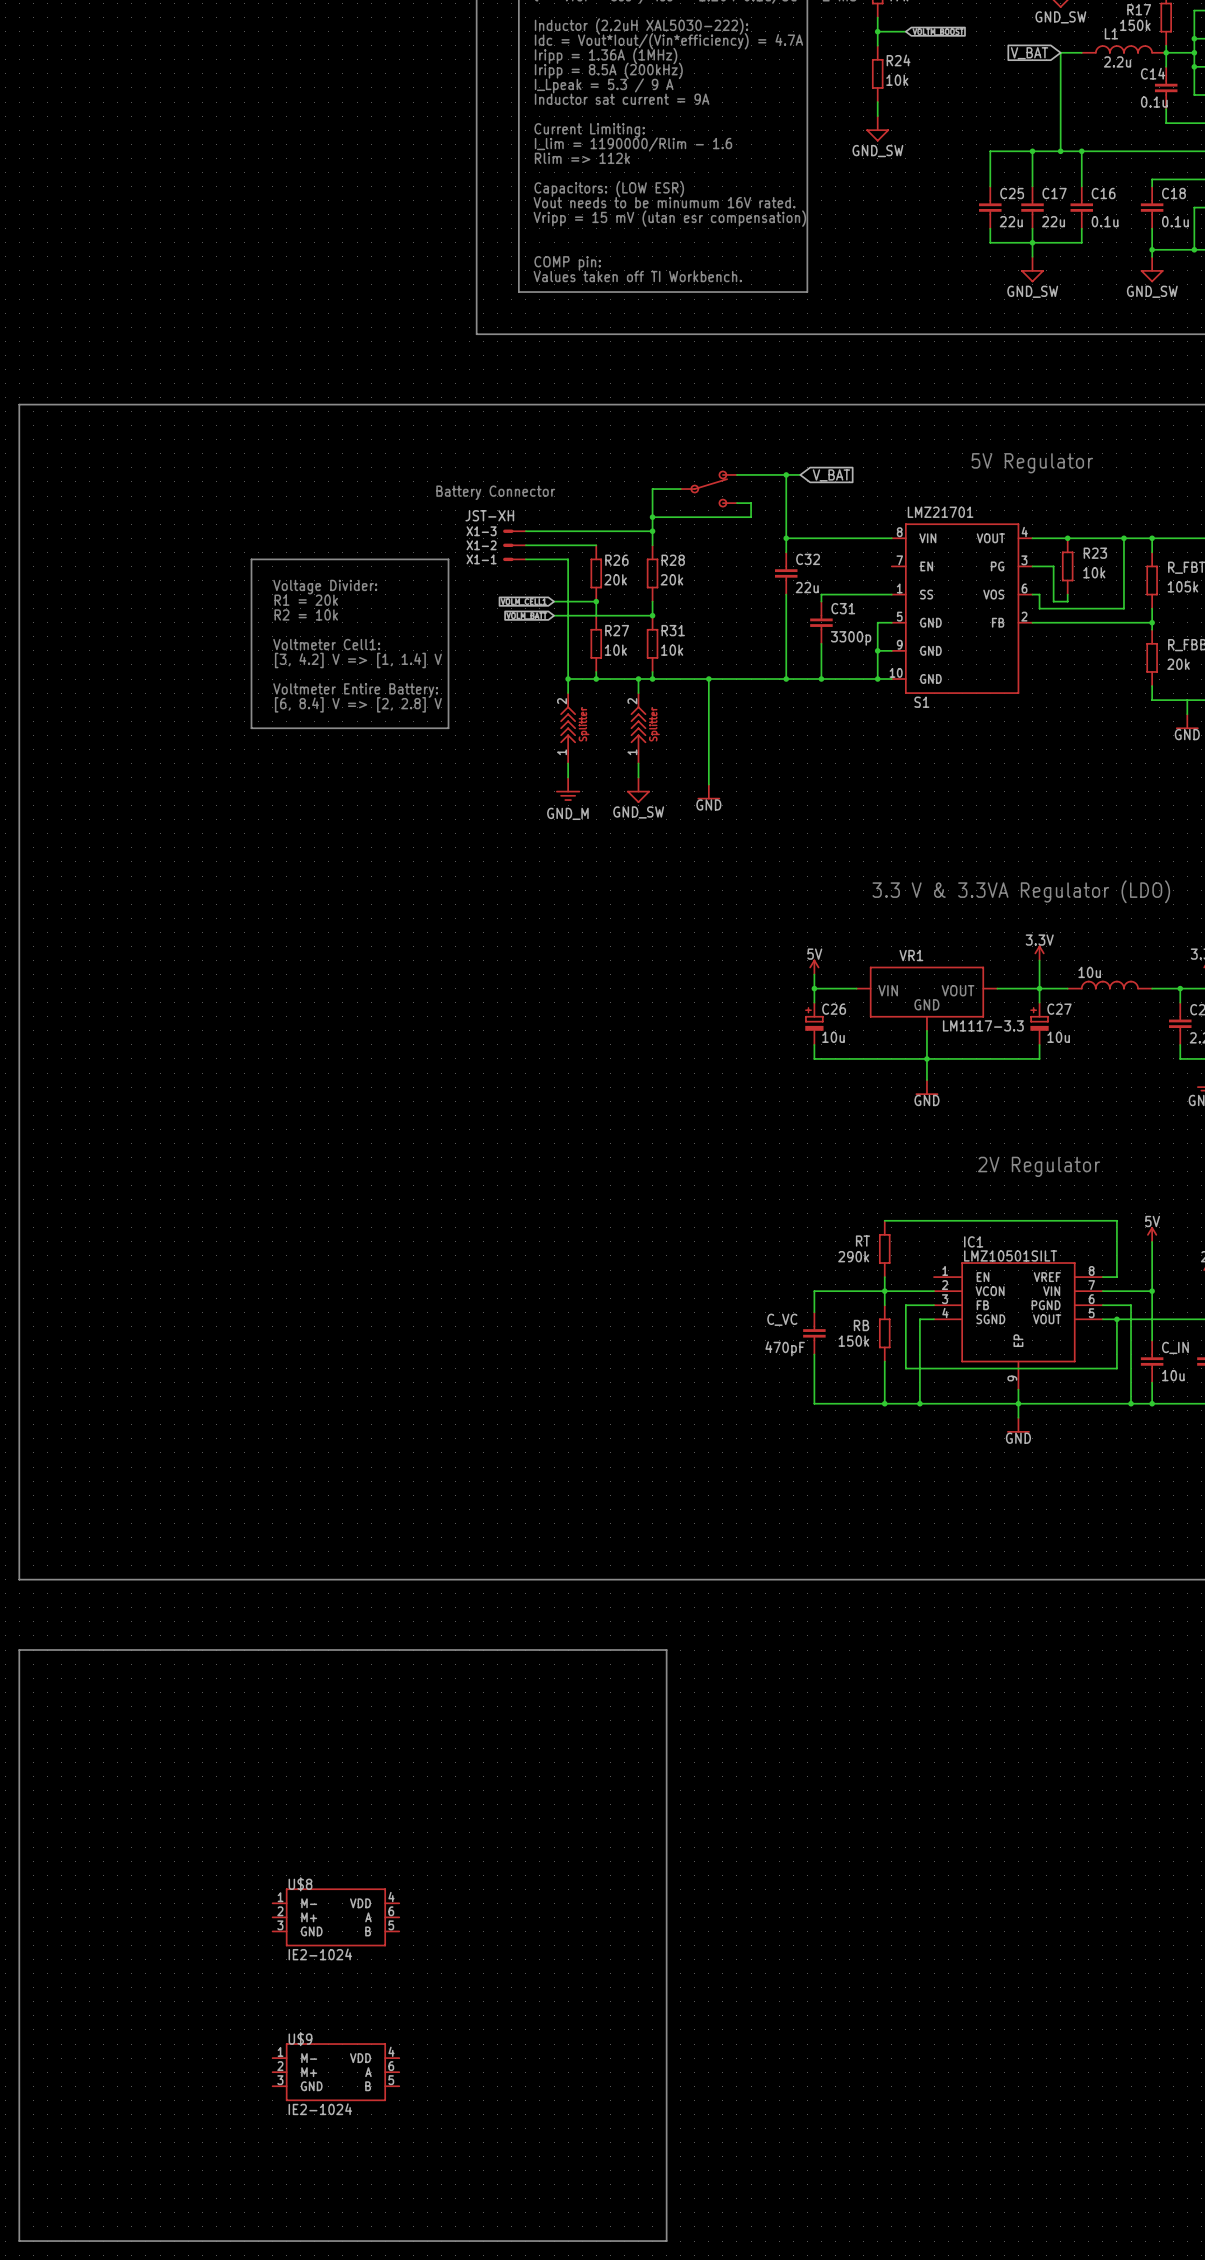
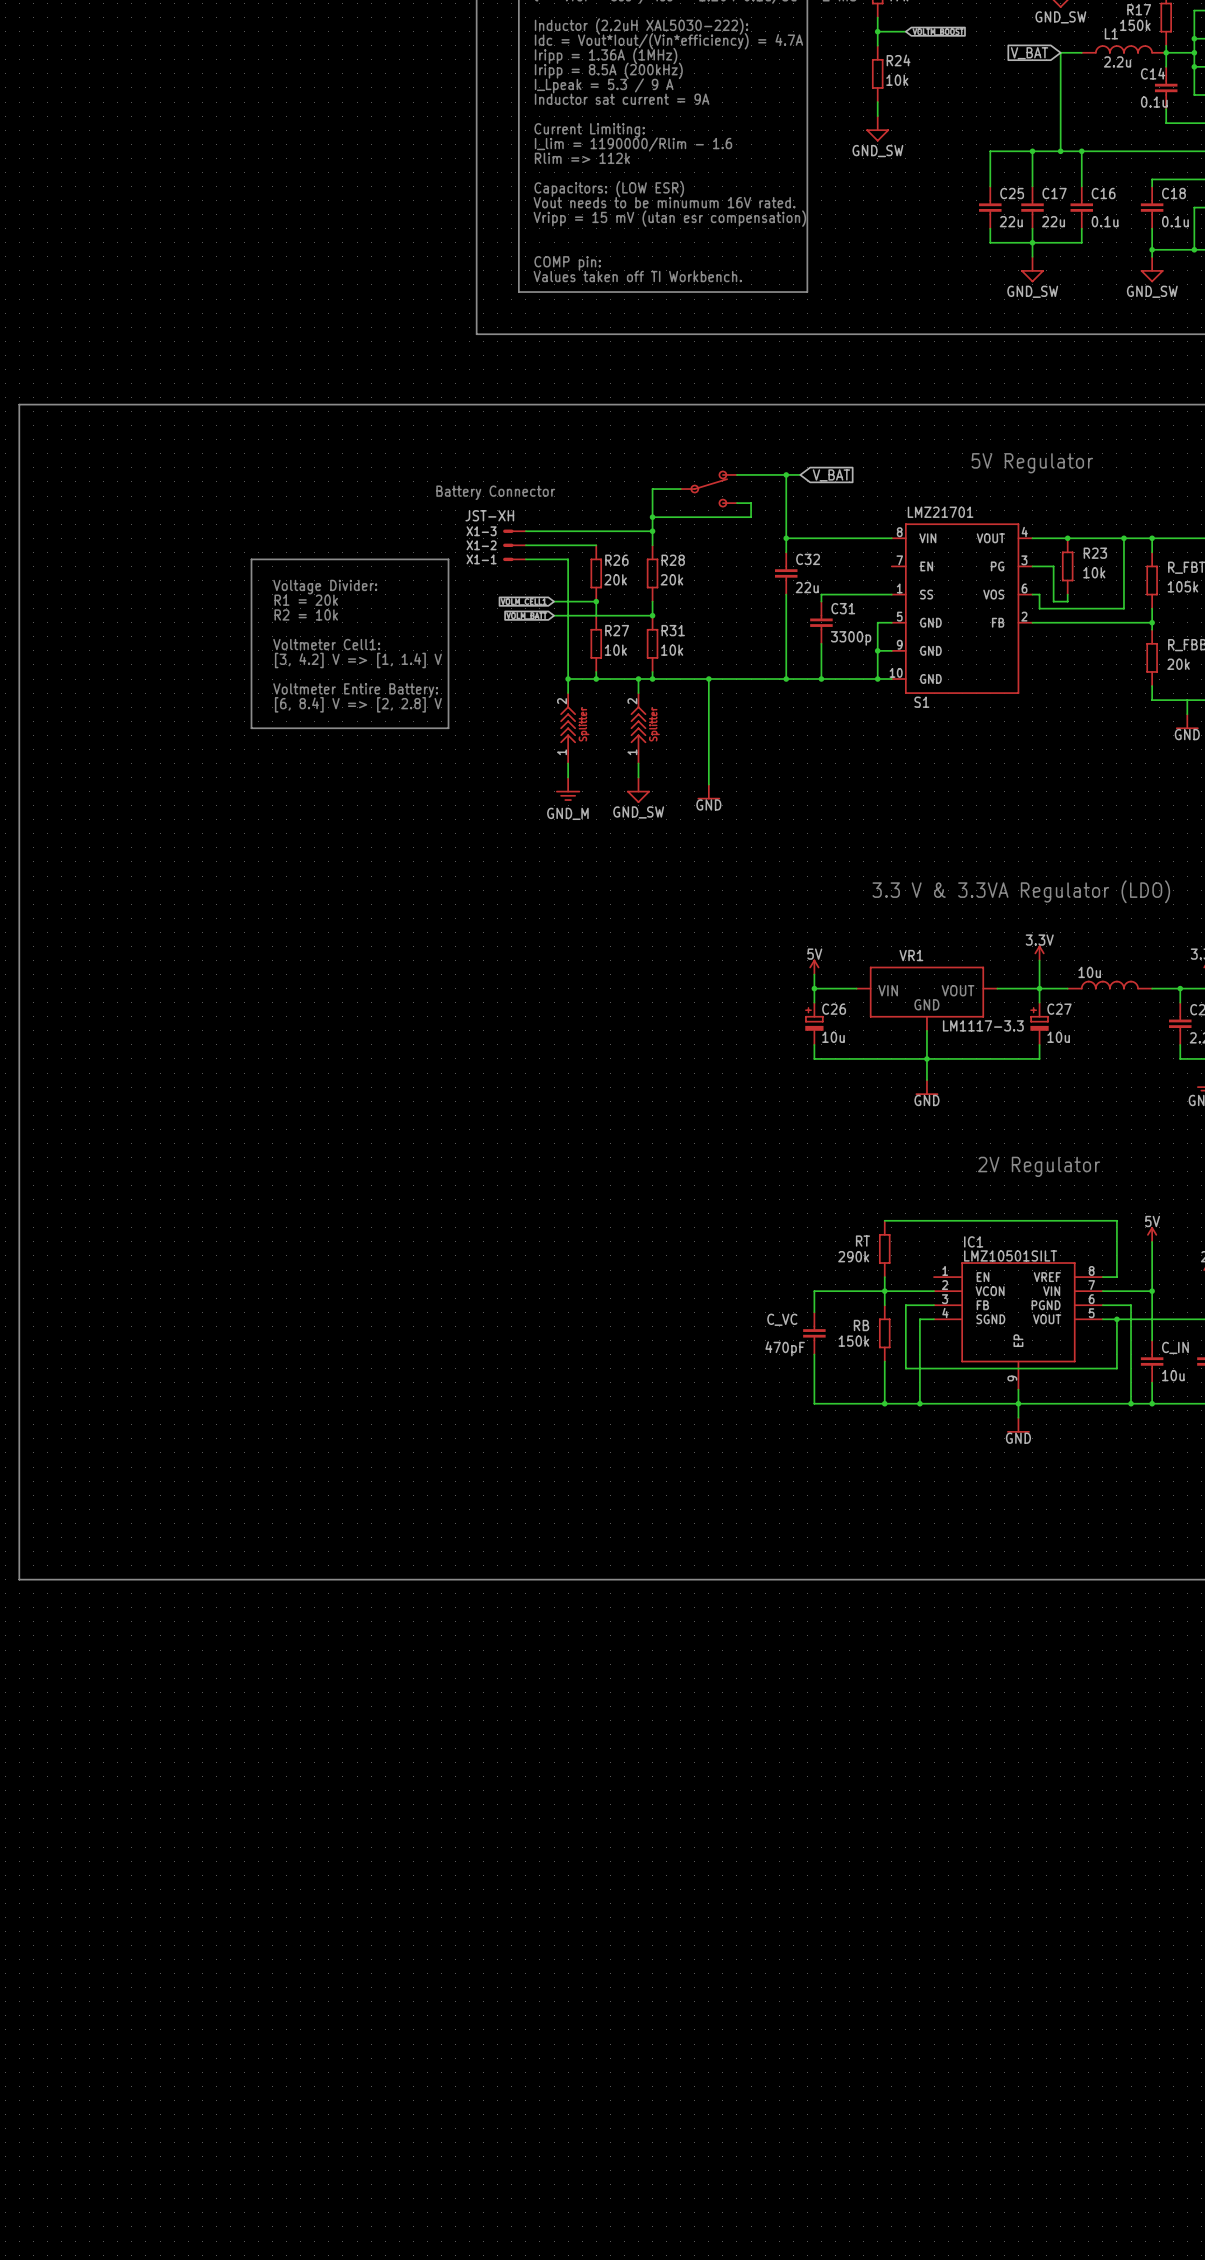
line: (19, 1650) (666, 1650) (666, 2241) (19, 2241) (19, 1650) -> none
U$8: IE2-1024 (335, 1917) -> none
U$9: IE2-1024 (335, 2072) -> none

